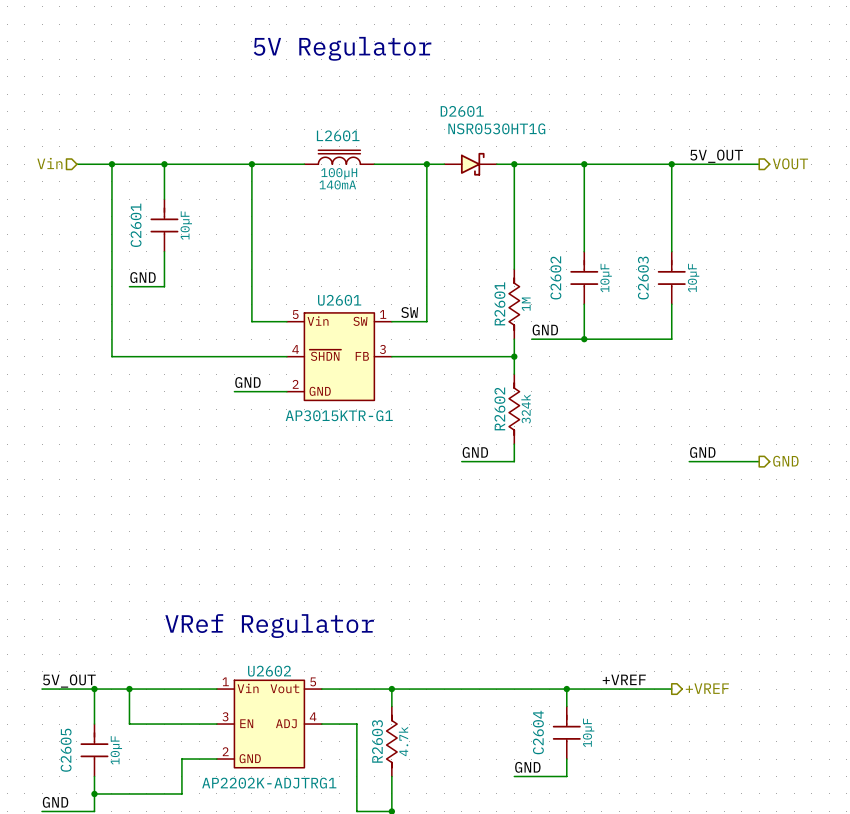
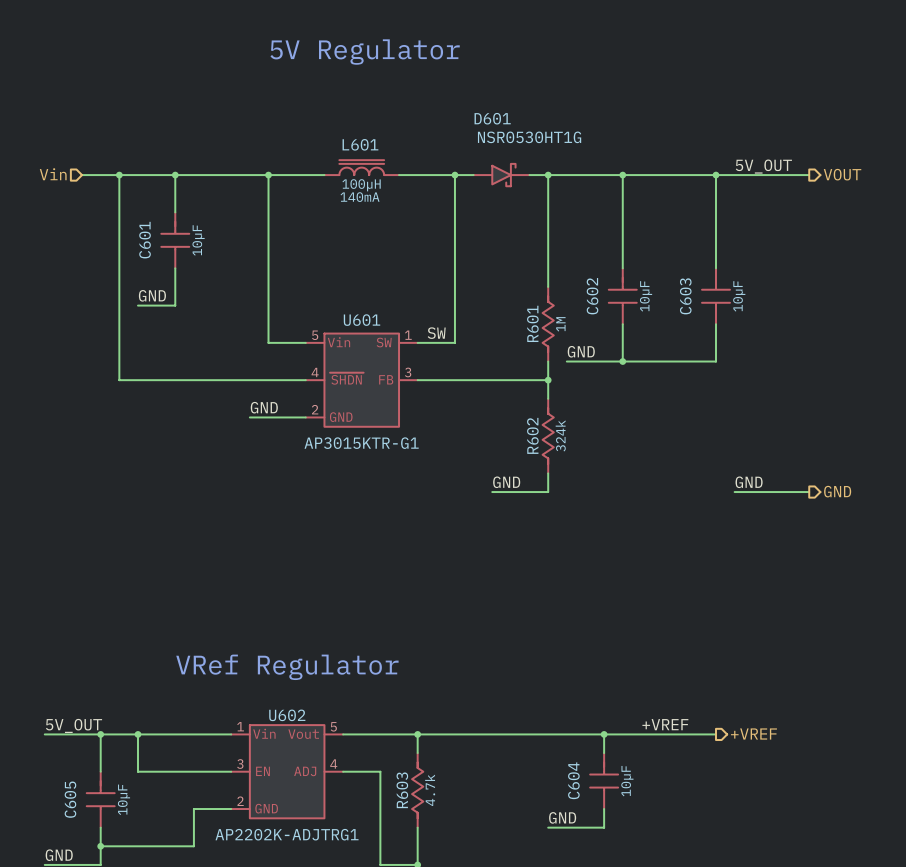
D2601 name: D2601 (462, 111) -> D601 (492, 118)
L2601 name: L2601 (338, 135) -> L601 (360, 144)
C2601 name: C2601 (136, 225) -> C601 (145, 240)
C2602 name: C2602 (555, 277) -> C602 (592, 296)
C2603 name: C2603 (643, 278) -> C603 (685, 296)
U2601 name: U2601 (339, 300) -> U601 (362, 320)
R2601 name: R2601 (499, 303) -> R601 (532, 323)
R2602 name: R2602 (499, 408) -> R602 (532, 435)
U2602 name: U2602 (269, 671) -> U602 (287, 715)
C2604 name: C2604 (538, 732) -> C604 (573, 780)
R2603 name: R2603 (377, 741) -> R603 (402, 790)
C2605 name: C2605 (66, 750) -> C605 (70, 799)

